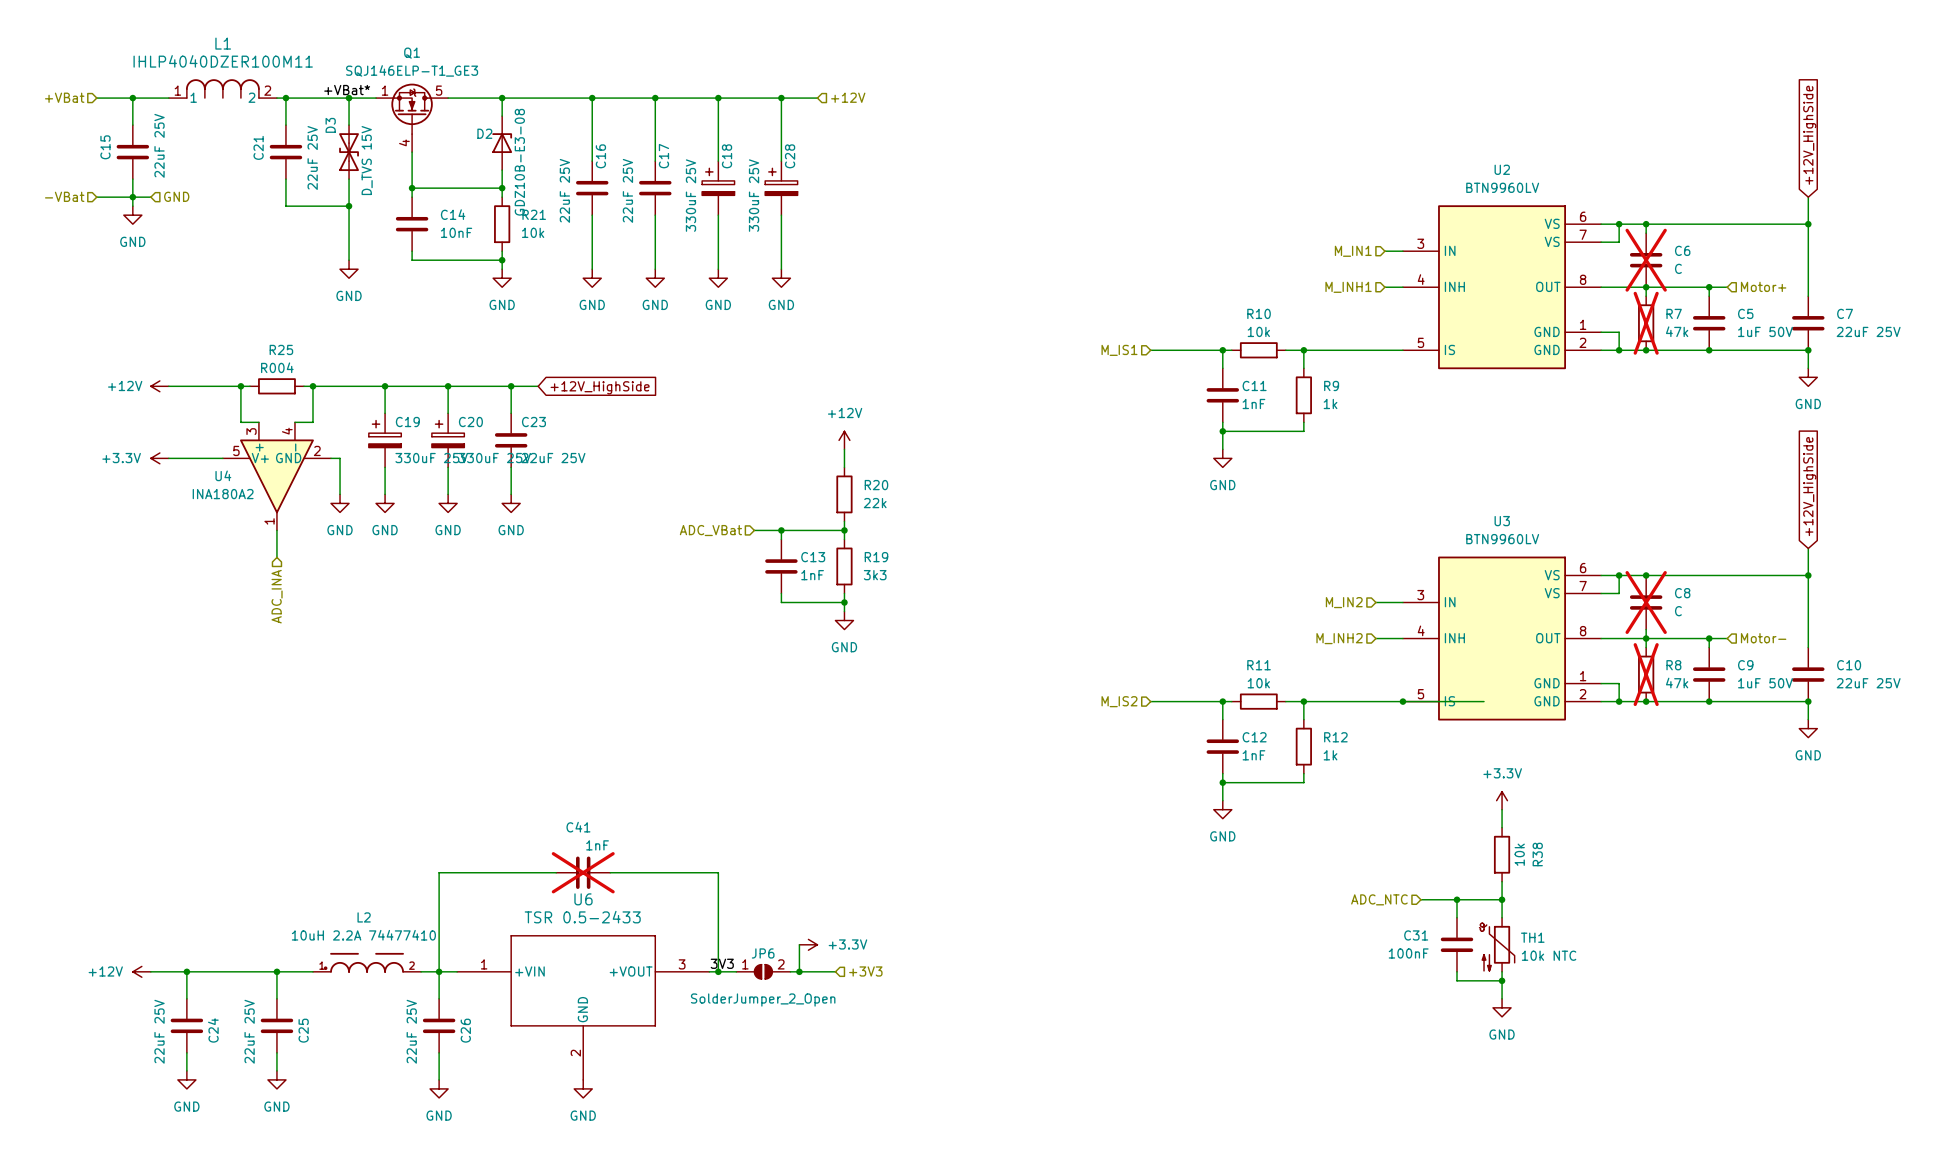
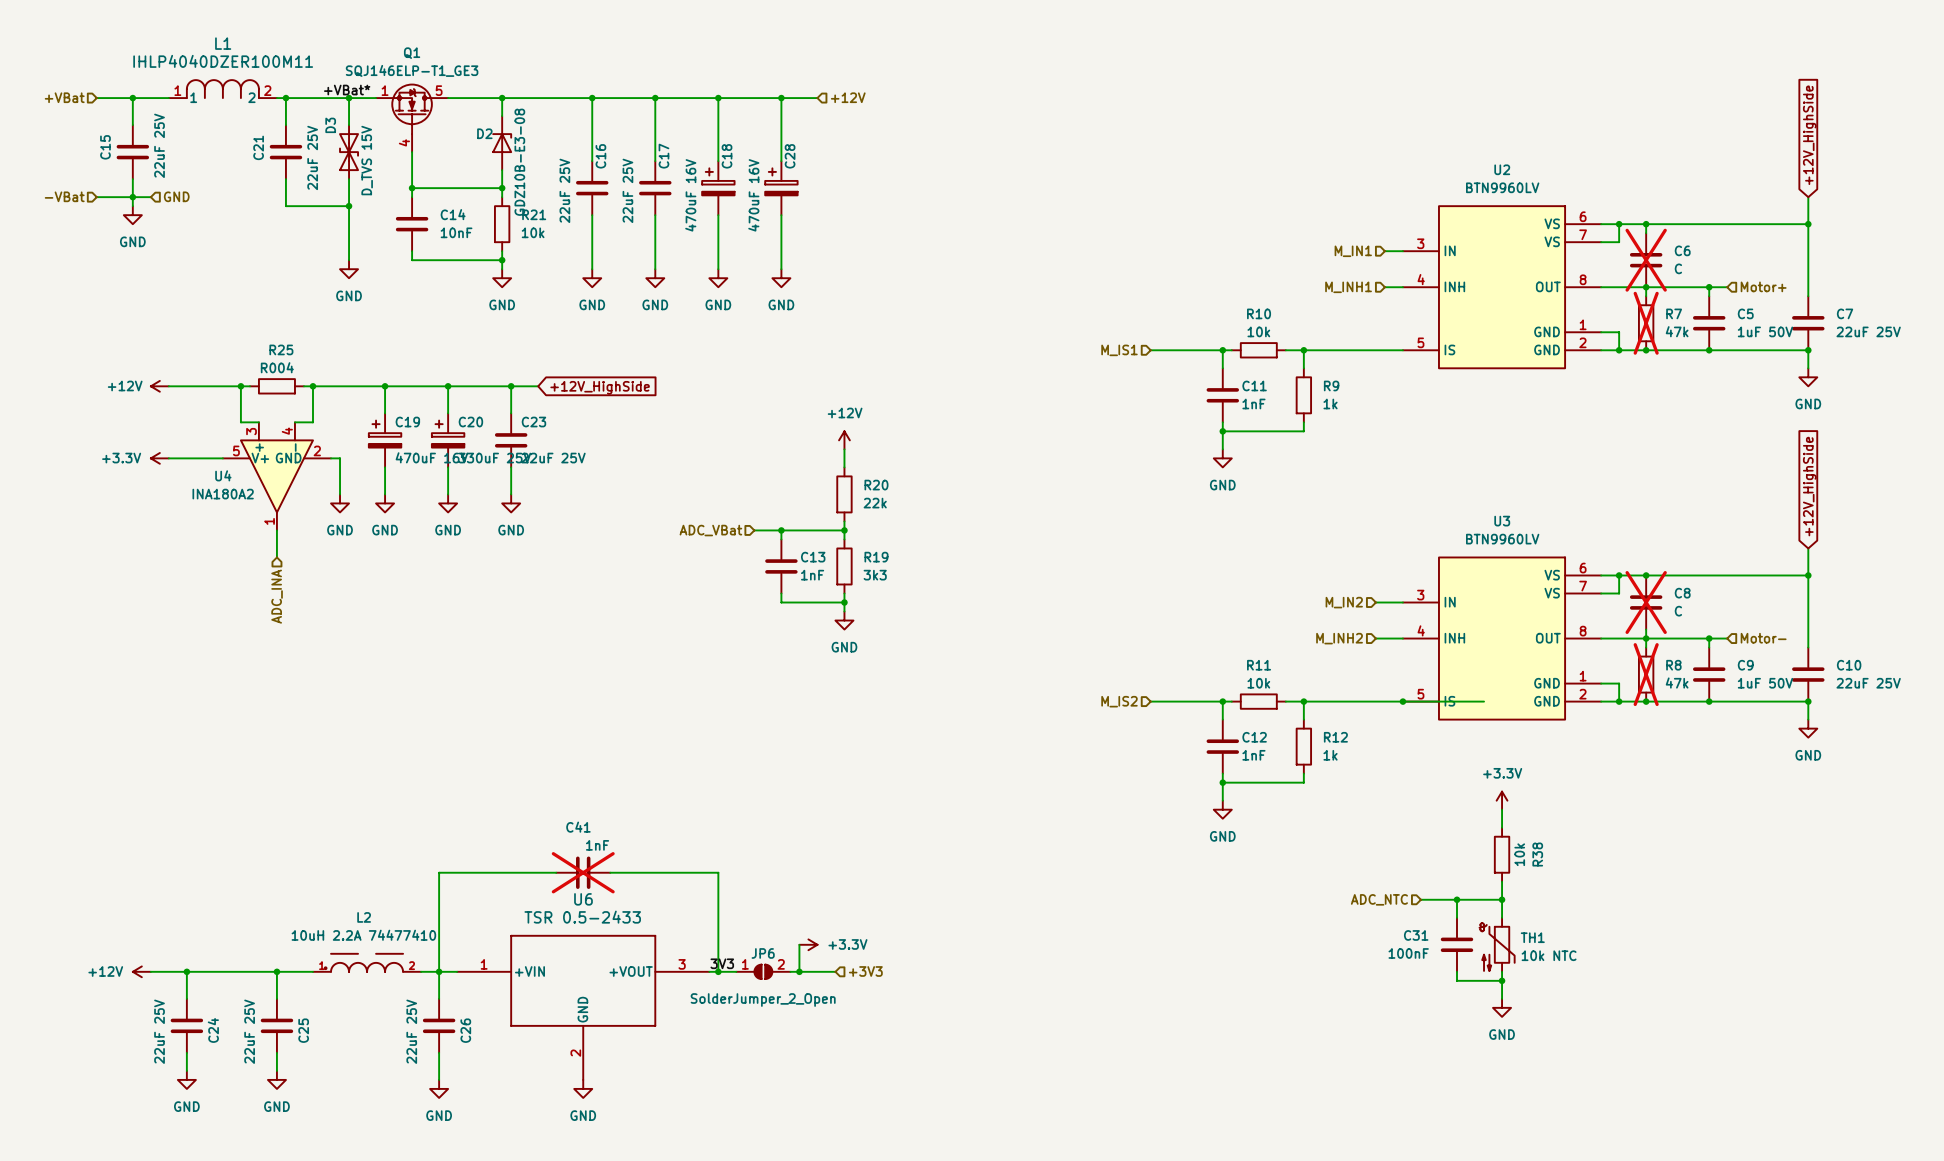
C18 value: 330uF 25V (690, 195) -> 470uF 16V (690, 195)
C28 value: 330uF 25V (754, 195) -> 470uF 16V (753, 195)
C19 value: 330uF 25V (431, 458) -> 470uF 16V (431, 457)

